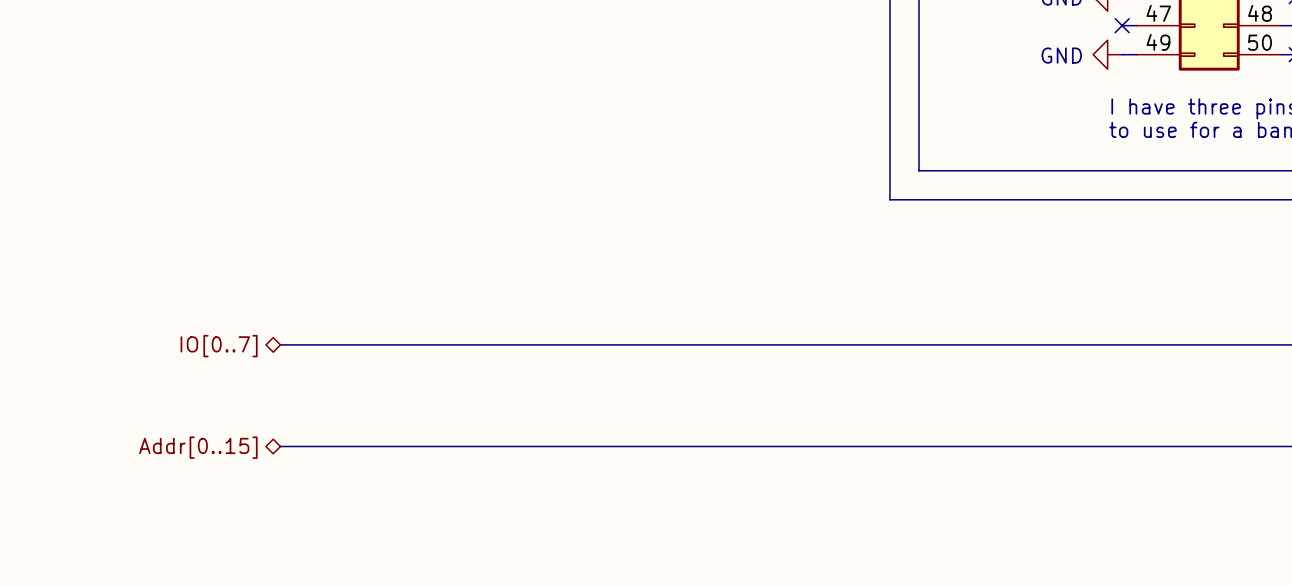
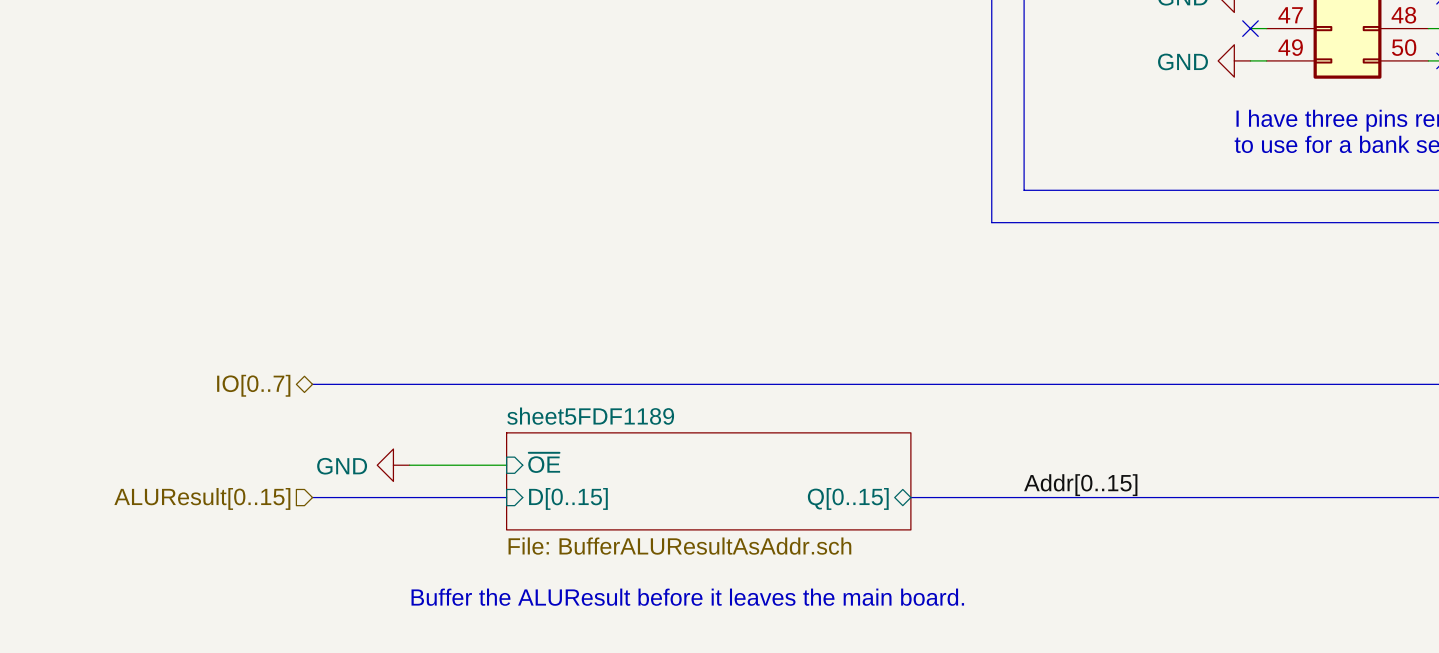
sheet pin: none -> ~{OE} (544, 462)
power symbol: none -> GND (393, 465)
wire: none -> (409, 465) (506, 465)
sheet sheet5FDF1189: none -> File: BufferALUResultAsAddr.sch (708, 481)
label: none -> Addr[0..15] (1080, 485)
bus: (454, 446) (817, 446) -> none
hierarchical label shape: bidirectional (198, 447) -> input (202, 498)
hierarchical label: Addr[0..15] (198, 447) -> ALUResult[0..15] (202, 498)
sheet pin: none -> D[0..15] (568, 498)
sheet pin: none -> Q[0..15] (848, 498)
text: none -> Buffer the ALUResult before it leaves the main board. (687, 597)

